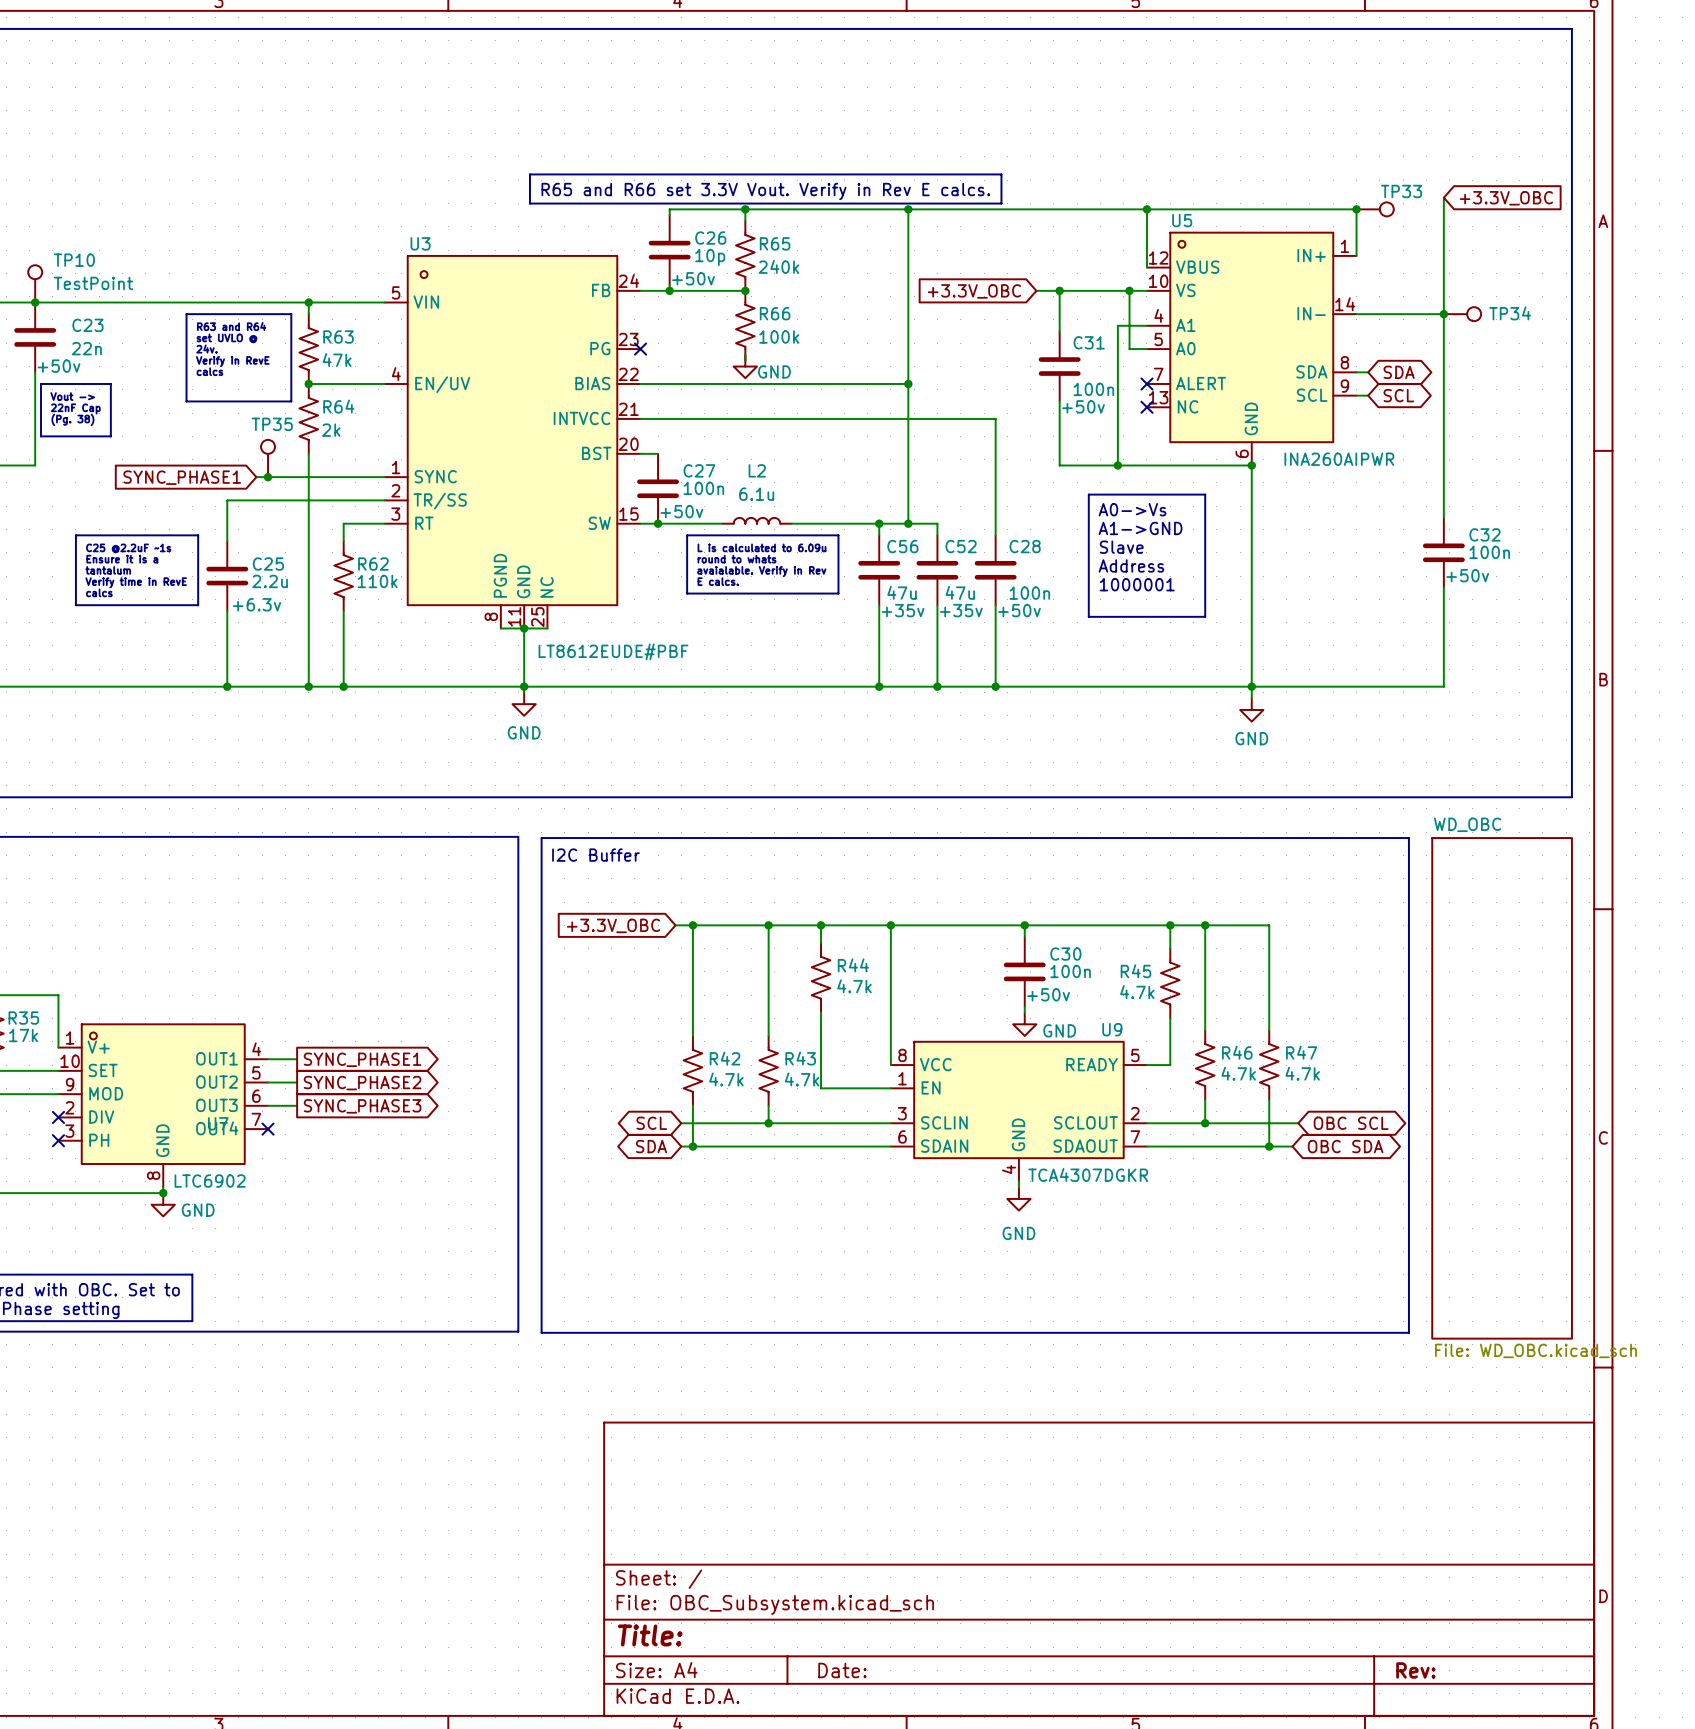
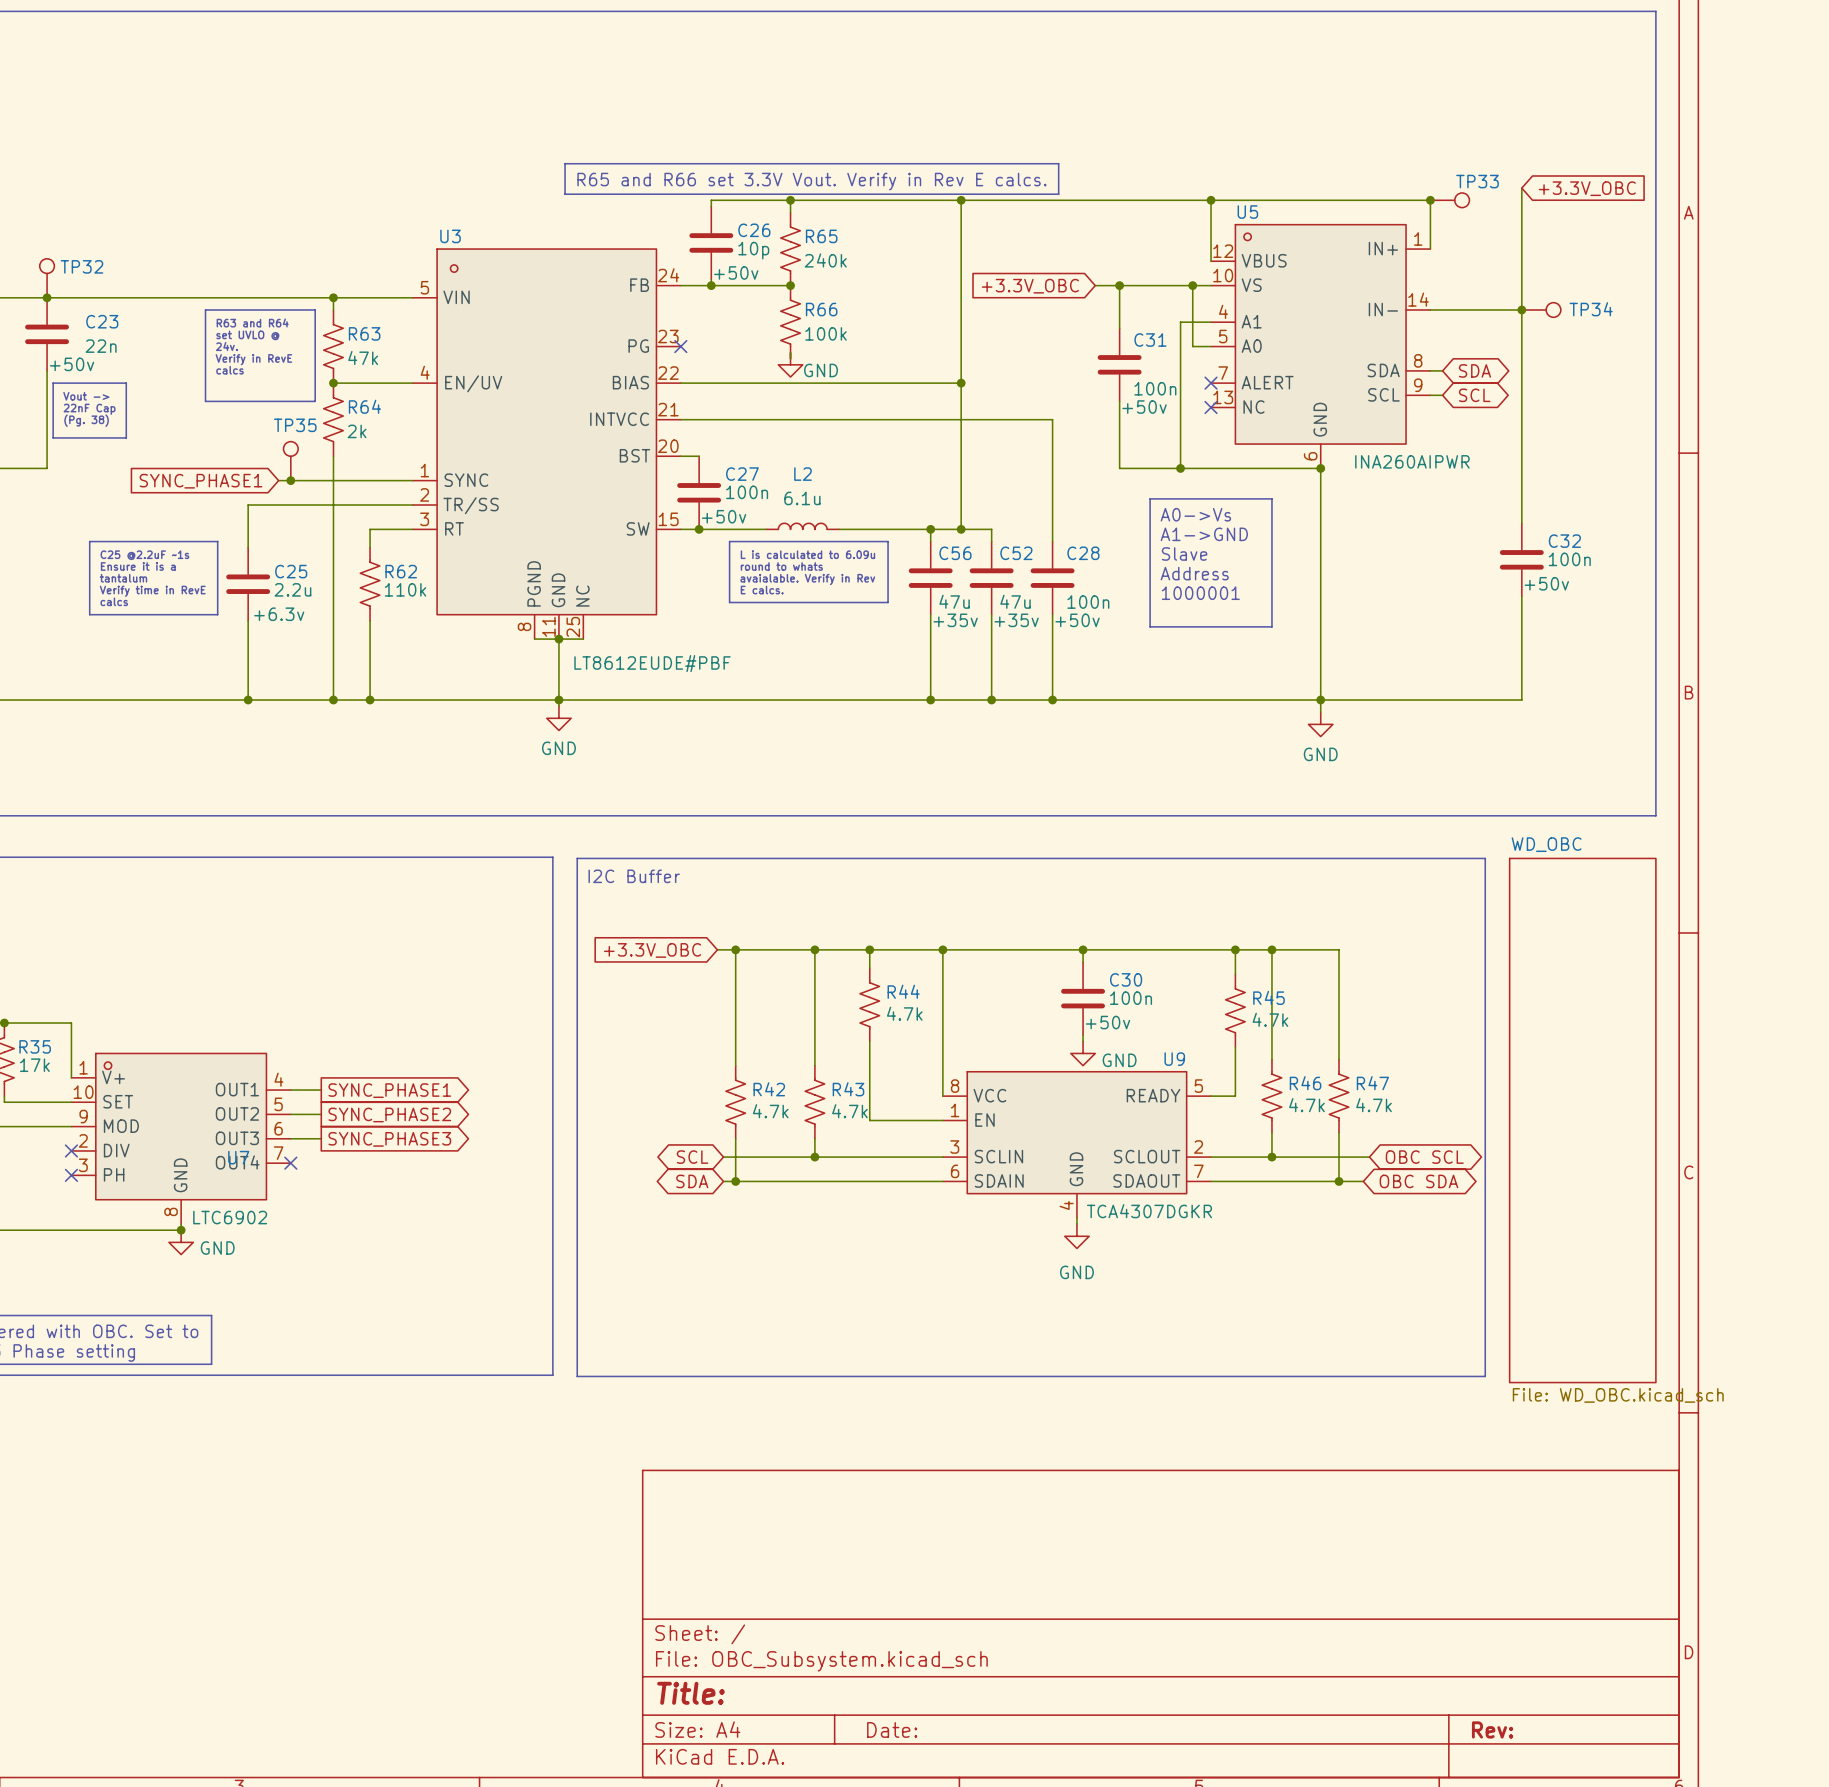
TP10 name: TP10 (74, 260) -> TP32 (81, 266)
TP10 value: TestPoint (93, 283) -> none
R45 name position: R45 (1135, 971) -> R45 (1268, 997)
R45 value position: 4.7k (1137, 992) -> 4.7k (1270, 1019)

